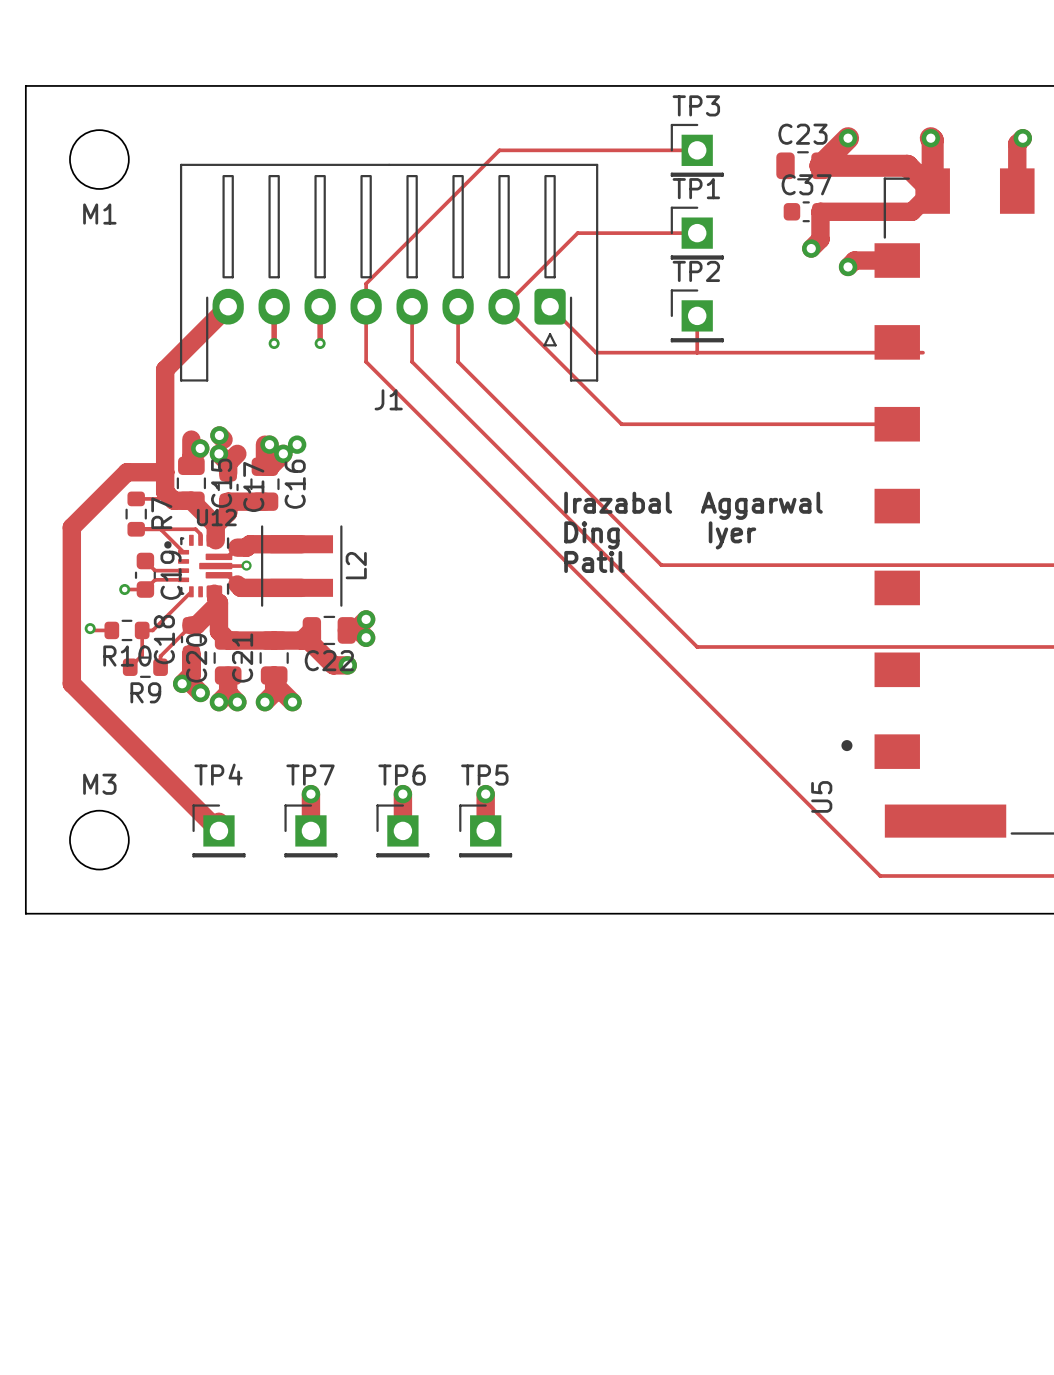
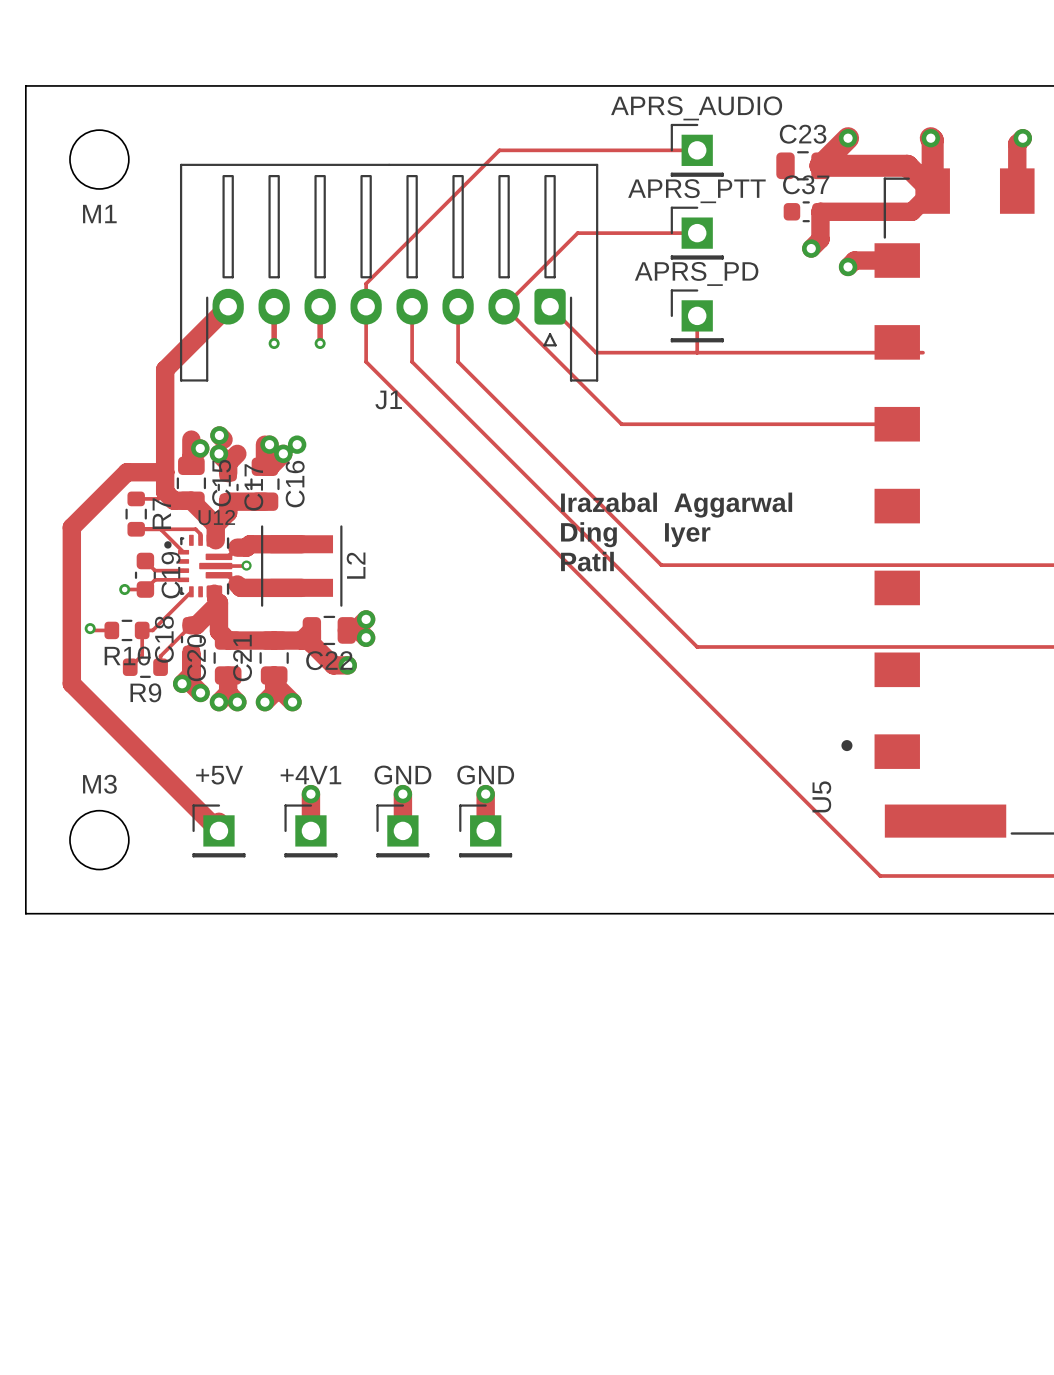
TP3 name: TP3 (696, 105) -> APRS_AUDIO (696, 108)
TP1 name: TP1 (696, 188) -> APRS_PTT (696, 191)
TP2 name: TP2 (696, 271) -> APRS_PD (696, 273)
TP4 name: TP4 (218, 774) -> +5V (219, 775)
TP7 name: TP7 (310, 775) -> +4V1 (310, 775)
TP6 name: TP6 (402, 775) -> GND (402, 775)
TP5 name: TP5 (484, 775) -> GND (485, 775)

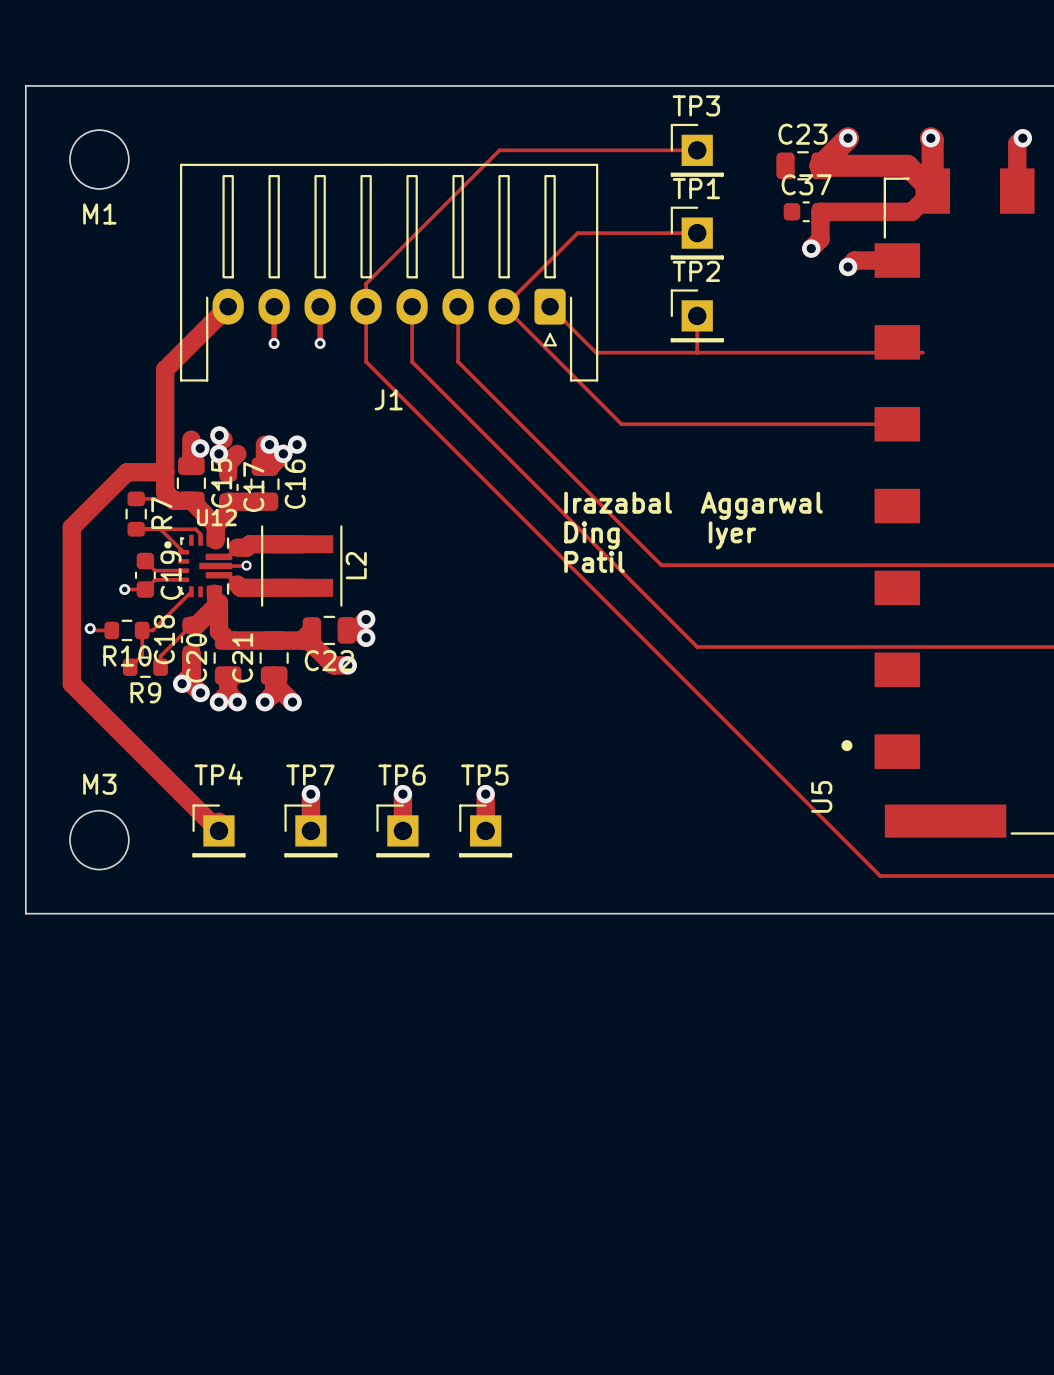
APRS_AUDIO name: APRS_AUDIO (696, 108) -> TP3 (696, 105)
APRS_PTT name: APRS_PTT (696, 191) -> TP1 (696, 188)
APRS_PD name: APRS_PD (696, 273) -> TP2 (696, 271)
+5V name: +5V (219, 775) -> TP4 (218, 774)
+4V1 name: +4V1 (310, 775) -> TP7 (310, 775)
GND name: GND (402, 775) -> TP6 (402, 775)
GND name: GND (485, 775) -> TP5 (484, 775)

